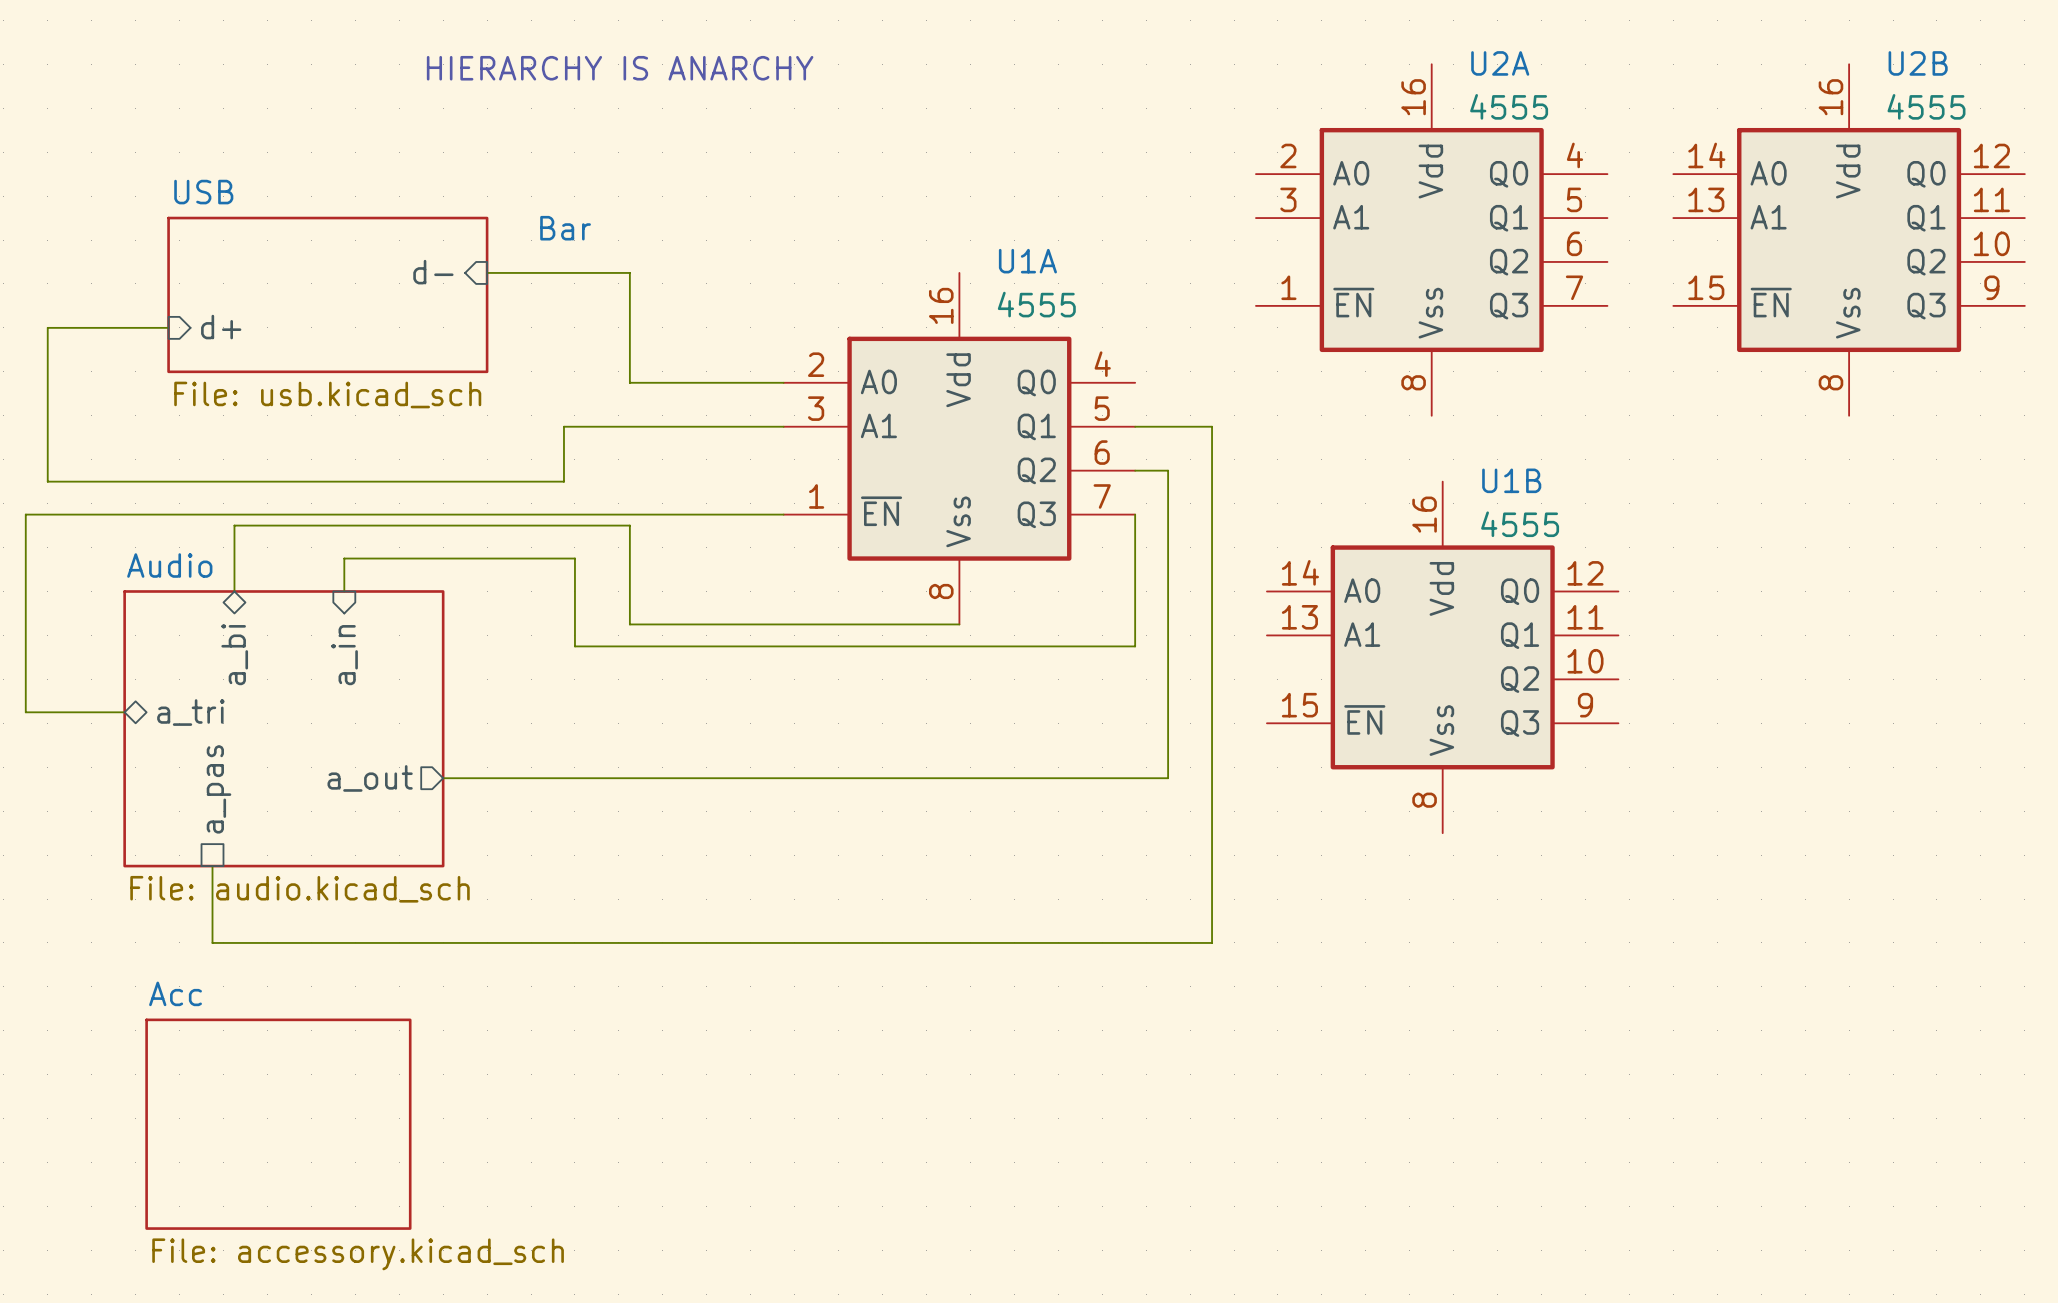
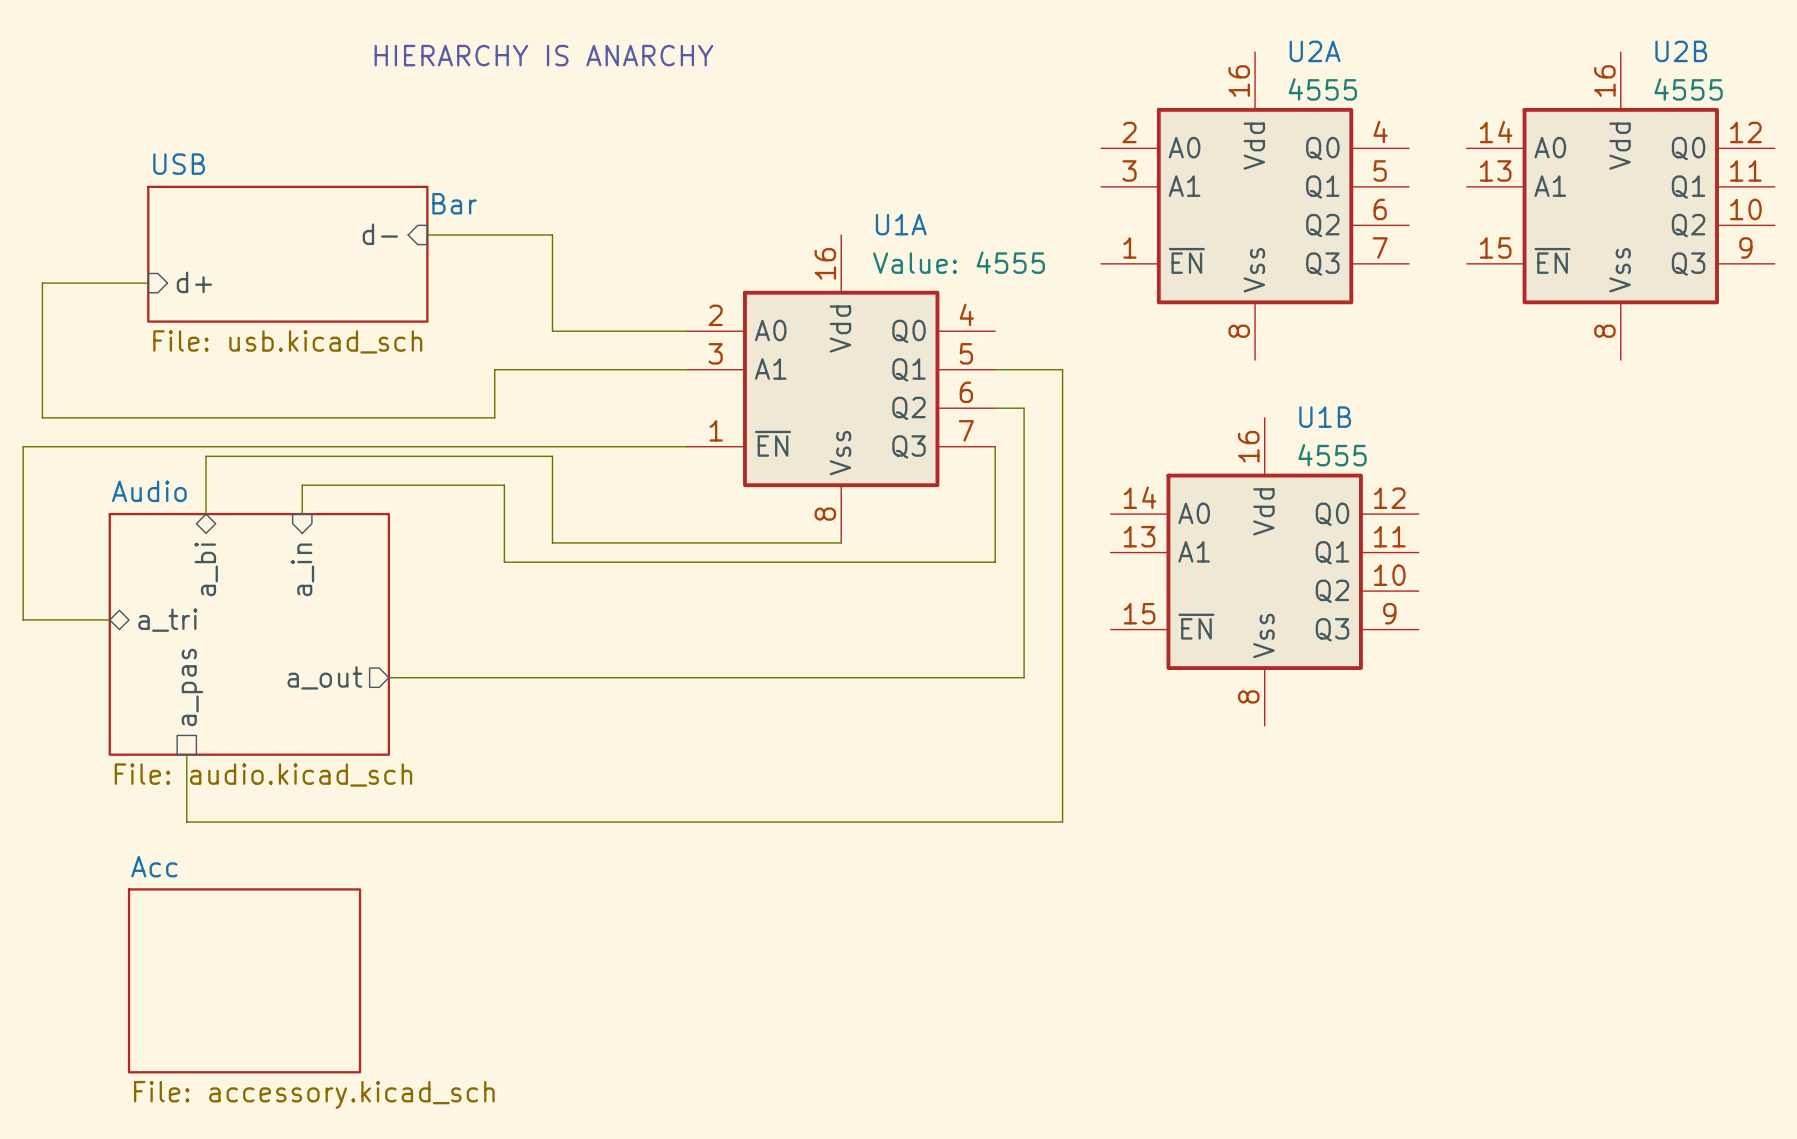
sheet USB text position: Bar (565, 228) -> Bar (454, 203)
U1A value: 4555 (1036, 304) -> Value: 4555 (959, 262)

